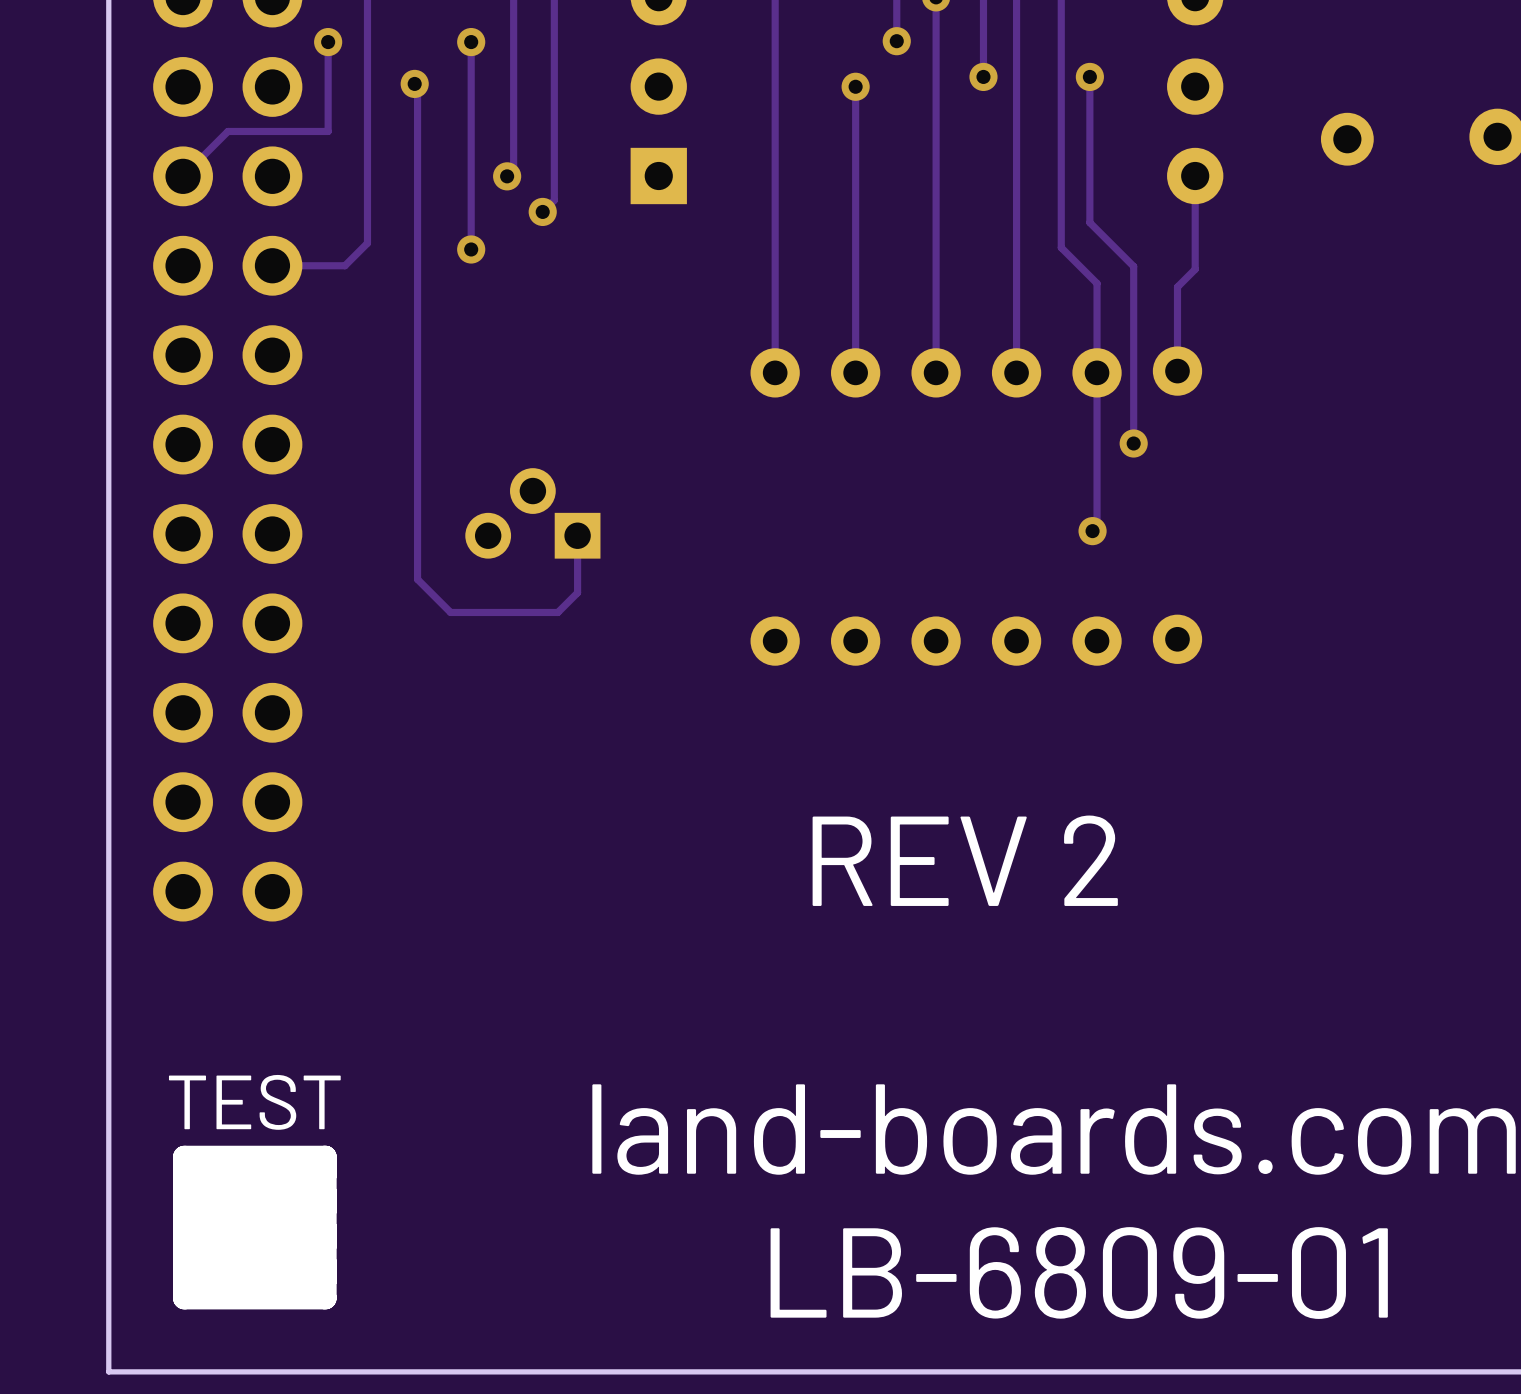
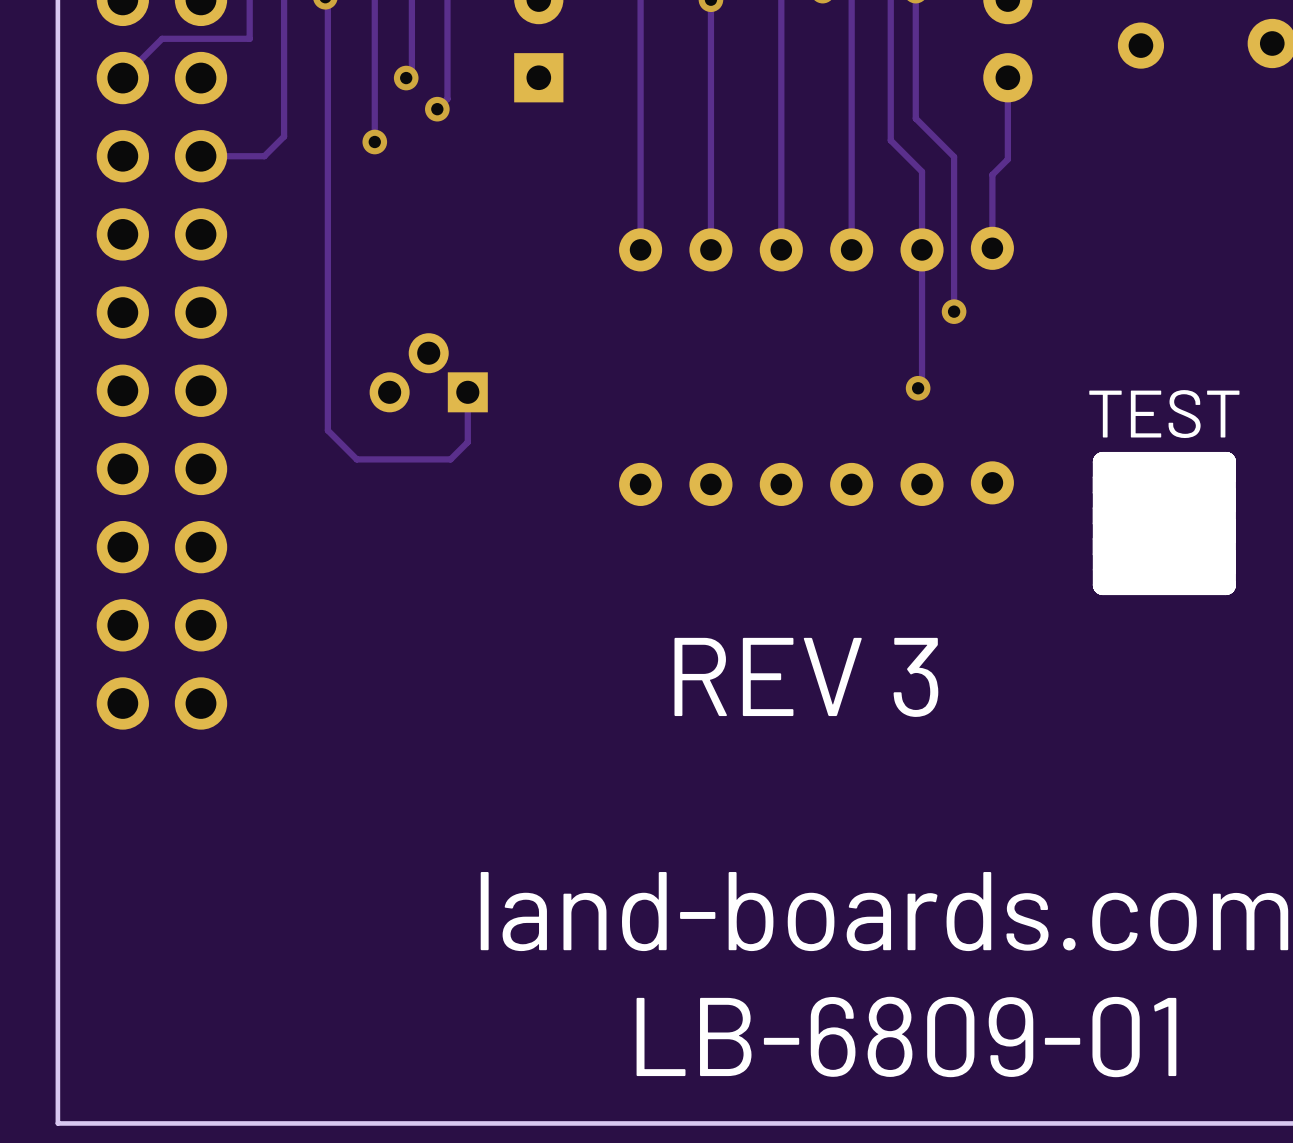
TEST: none -> (1164, 523)
text: REV 2 (965, 860) -> REV 3 (806, 677)
TEST: (254, 1227) -> none

